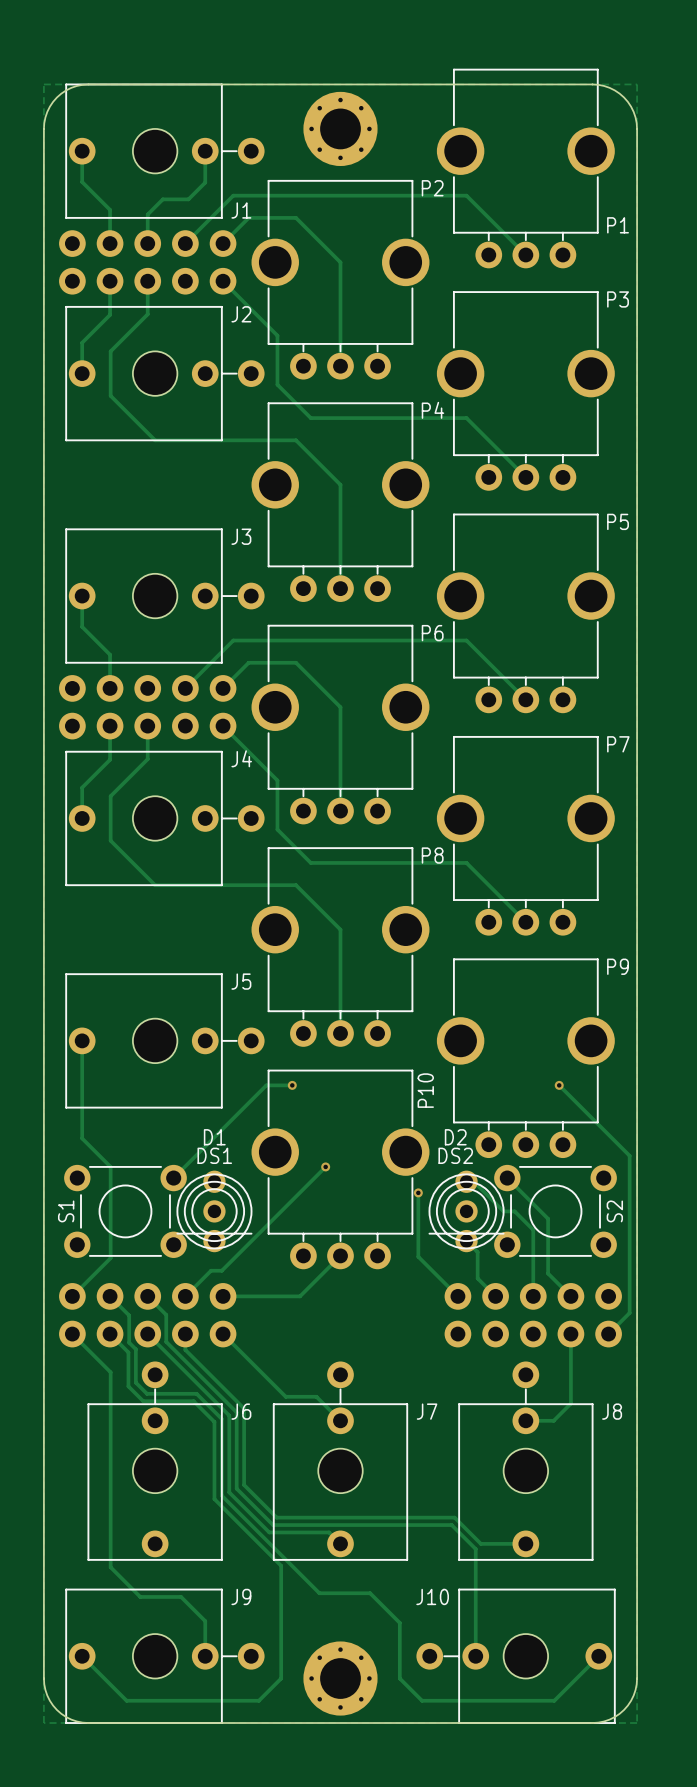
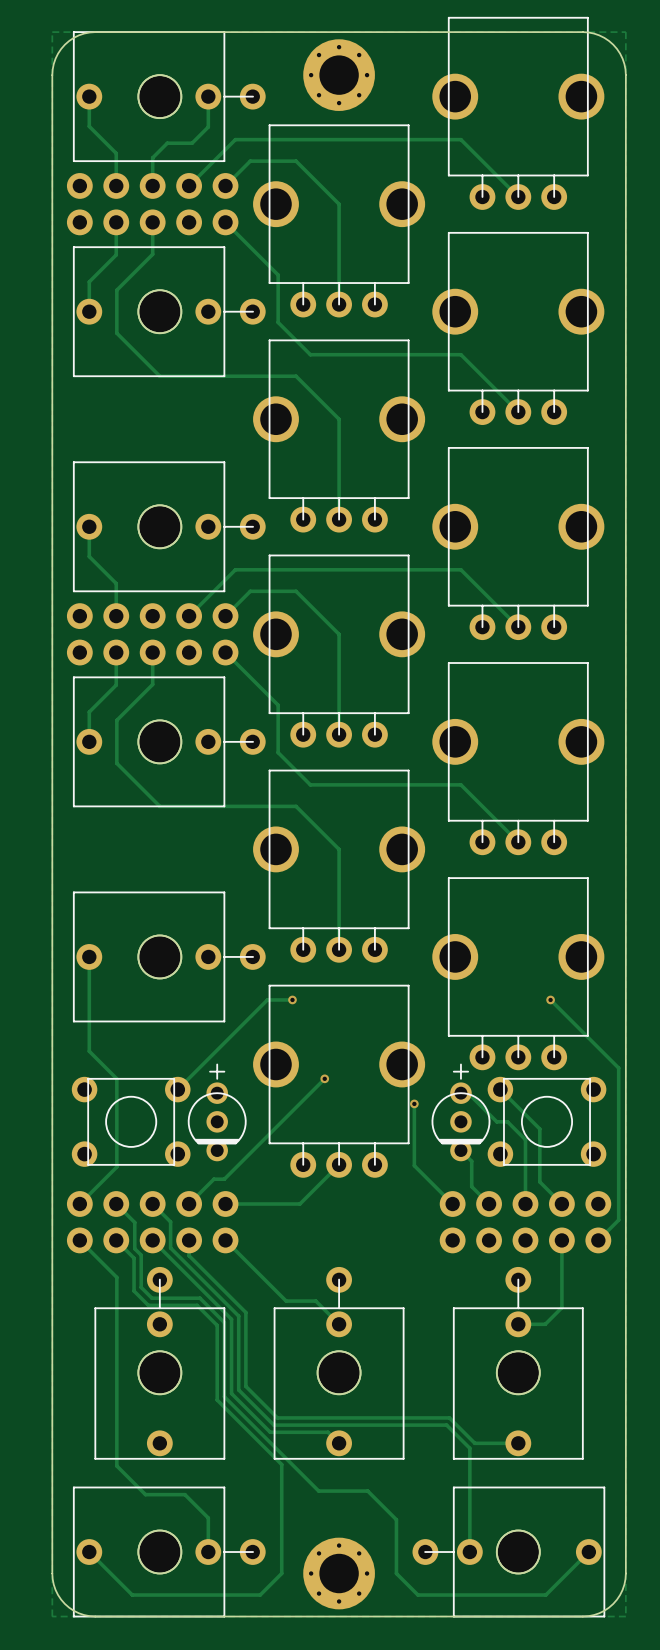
J1: (164, 151) -> none
part: none -> (169, 96)
P1: (525, 168) -> none
part: none -> (518, 113)
P2: (340, 279) -> none
part: none -> (339, 220)
J2: (164, 373) -> none
part: none -> (169, 311)
P3: (525, 390) -> none
part: none -> (518, 328)
P4: (340, 502) -> none
part: none -> (339, 436)
J3: (164, 596) -> none
part: none -> (169, 526)
P5: (525, 613) -> none
part: none -> (518, 543)
P6: (340, 724) -> none
part: none -> (339, 651)
J4: (164, 818) -> none
part: none -> (169, 741)
P7: (525, 835) -> none
part: none -> (518, 758)
P8: (340, 947) -> none
part: none -> (339, 866)
J5: (164, 1040) -> none
part: none -> (169, 956)
P9: (525, 1058) -> none
part: none -> (518, 973)
P10: (340, 1169) -> none
part: none -> (339, 1081)
part: none -> (217, 1112)
part: none -> (460, 1112)
S1: (125, 1211) -> none
part: none -> (131, 1121)
D1: (214, 1211) -> none
DS1: (214, 1211) -> none
D2: (466, 1211) -> none
DS2: (466, 1211) -> none
S2: (555, 1211) -> none
part: none -> (547, 1121)
J6: (155, 1461) -> none
part: none -> (159, 1363)
J7: (340, 1461) -> none
part: none -> (339, 1363)
J8: (525, 1461) -> none
part: none -> (518, 1363)
J9: (164, 1656) -> none
part: none -> (169, 1552)
J10: (516, 1656) -> none
part: none -> (508, 1552)

